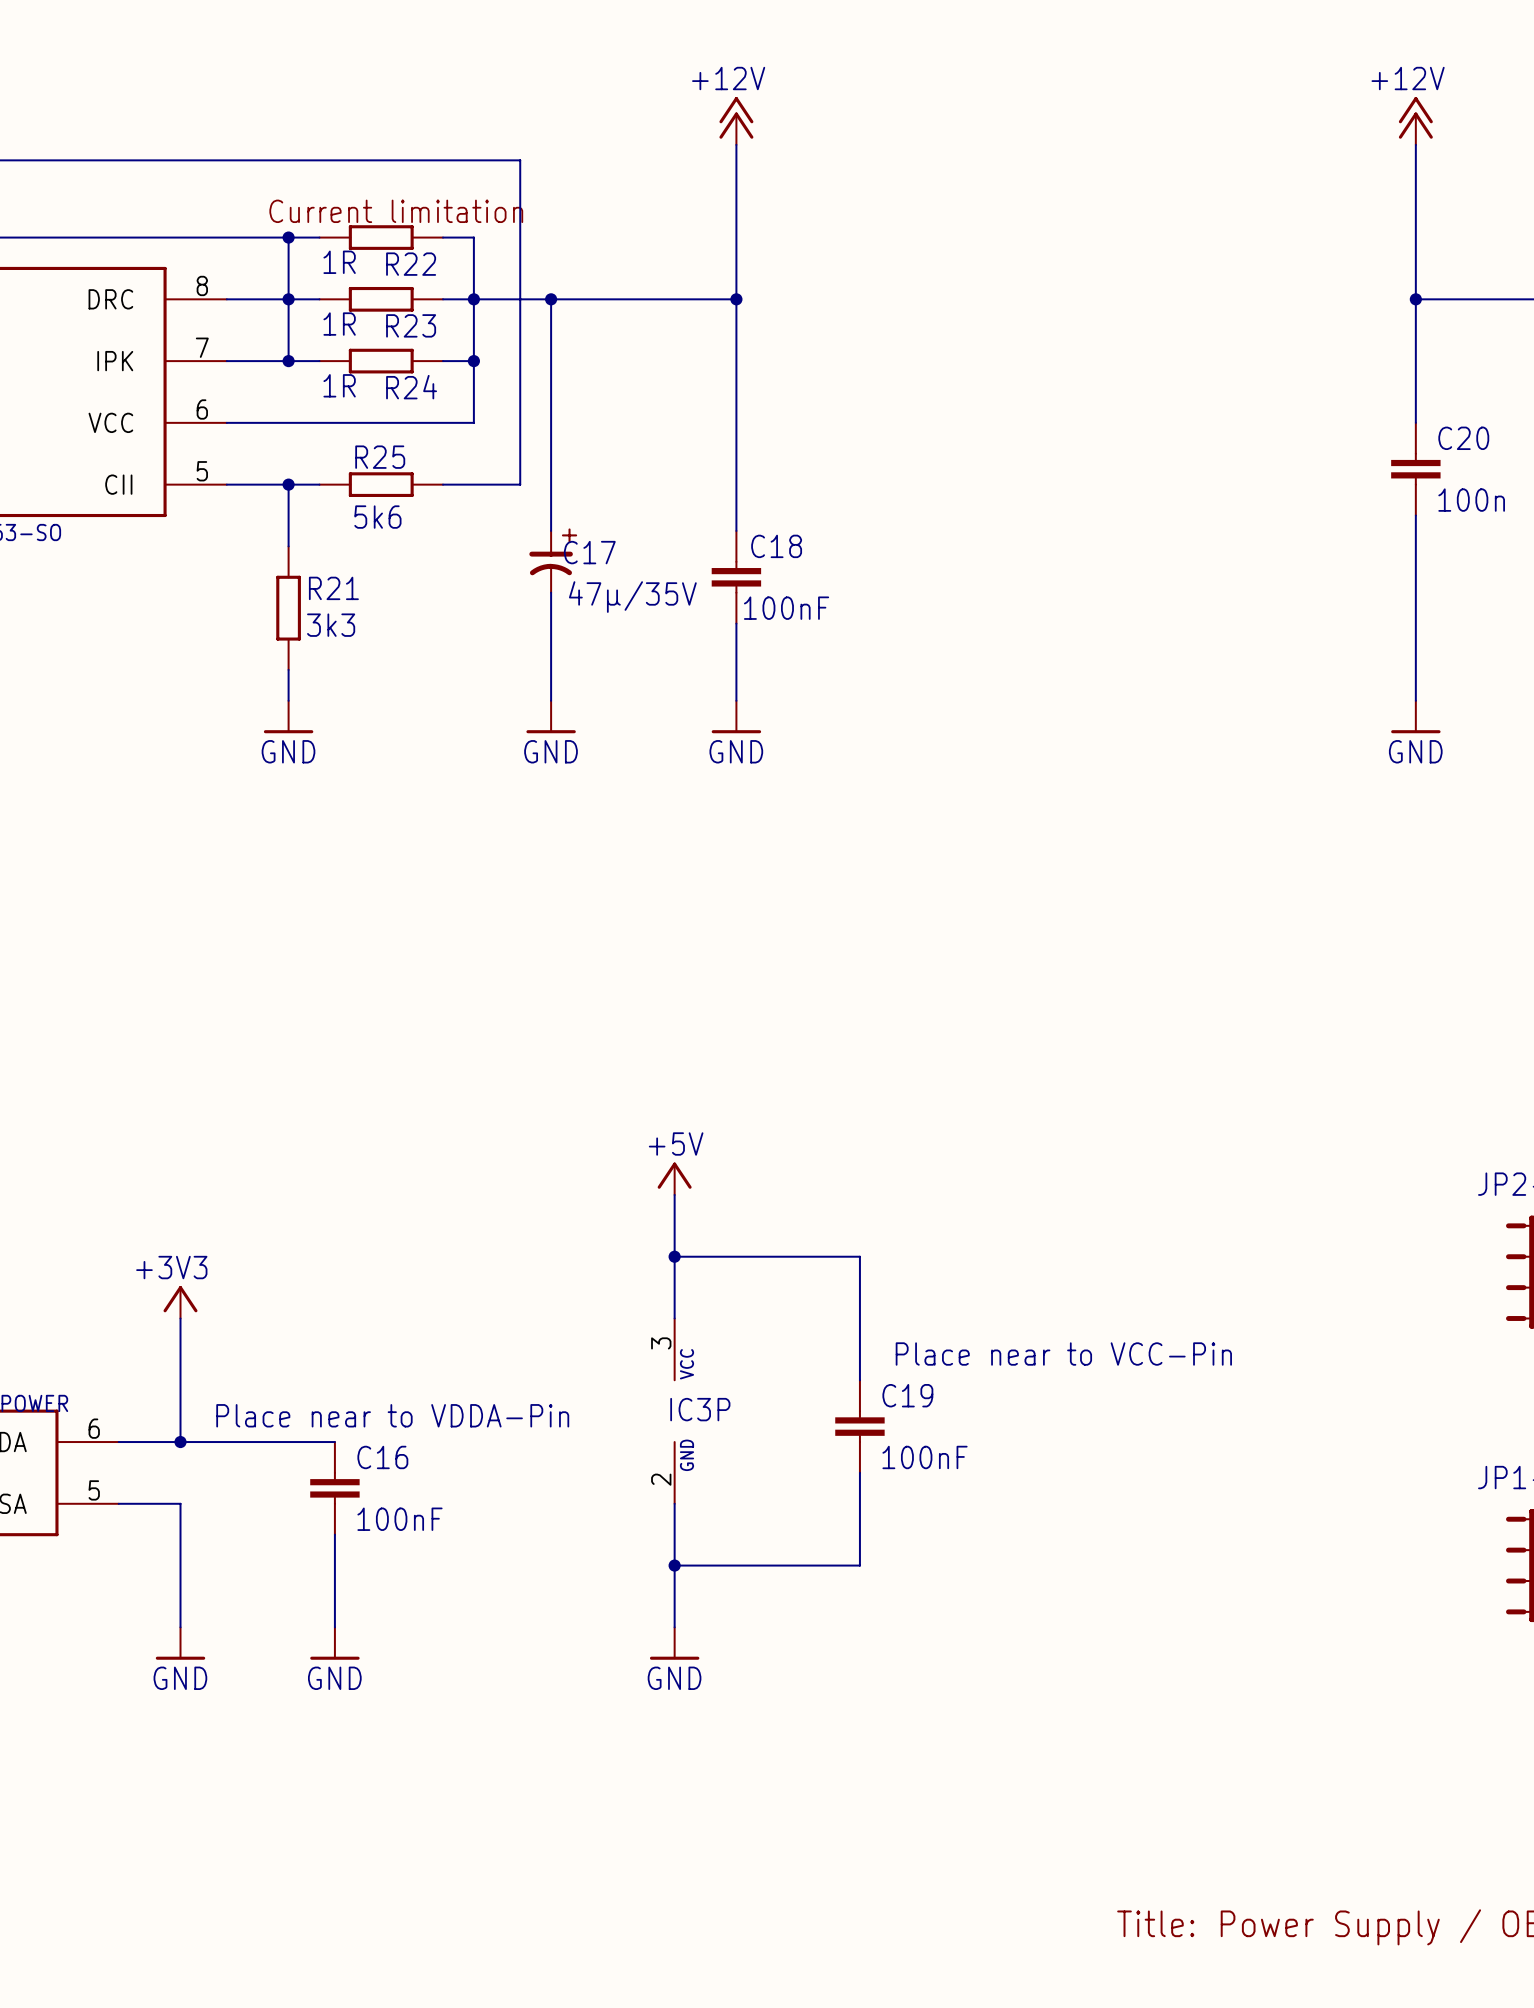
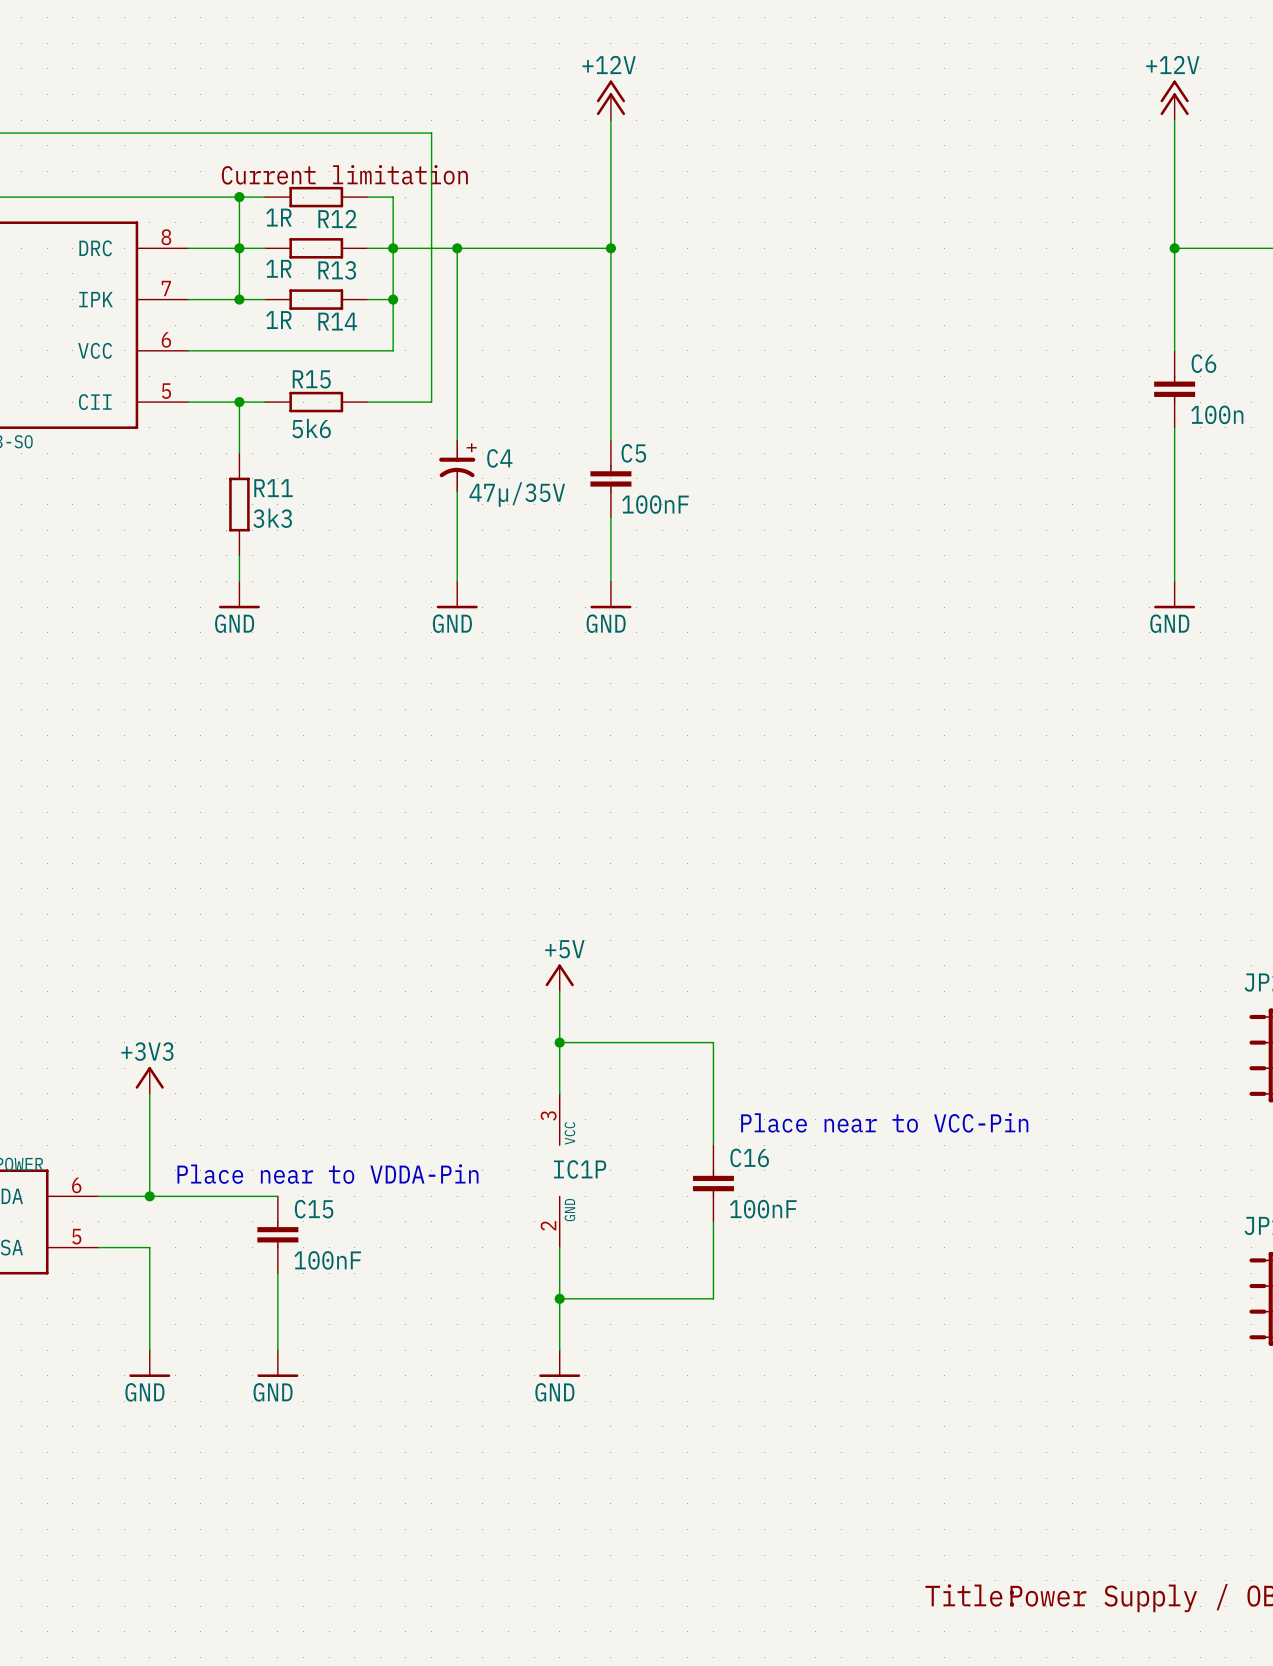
R22 name: R22 (411, 264) -> R12 (337, 218)
R23 name: R23 (411, 325) -> R13 (337, 270)
R24 name: R24 (411, 387) -> R14 (337, 321)
C20 name: C20 (1463, 438) -> C6 (1203, 363)
R25 name: R25 (380, 457) -> R15 (311, 379)
C18 name: C18 (776, 546) -> C5 (633, 453)
C17 name: C17 (589, 552) -> C4 (499, 458)
R21 name: R21 (333, 588) -> R11 (273, 488)
C19 name: C19 (907, 1395) -> C16 (749, 1157)
IC3P name: IC3P (700, 1409) -> IC1P (580, 1169)
C16 name: C16 (382, 1457) -> C15 (314, 1209)

